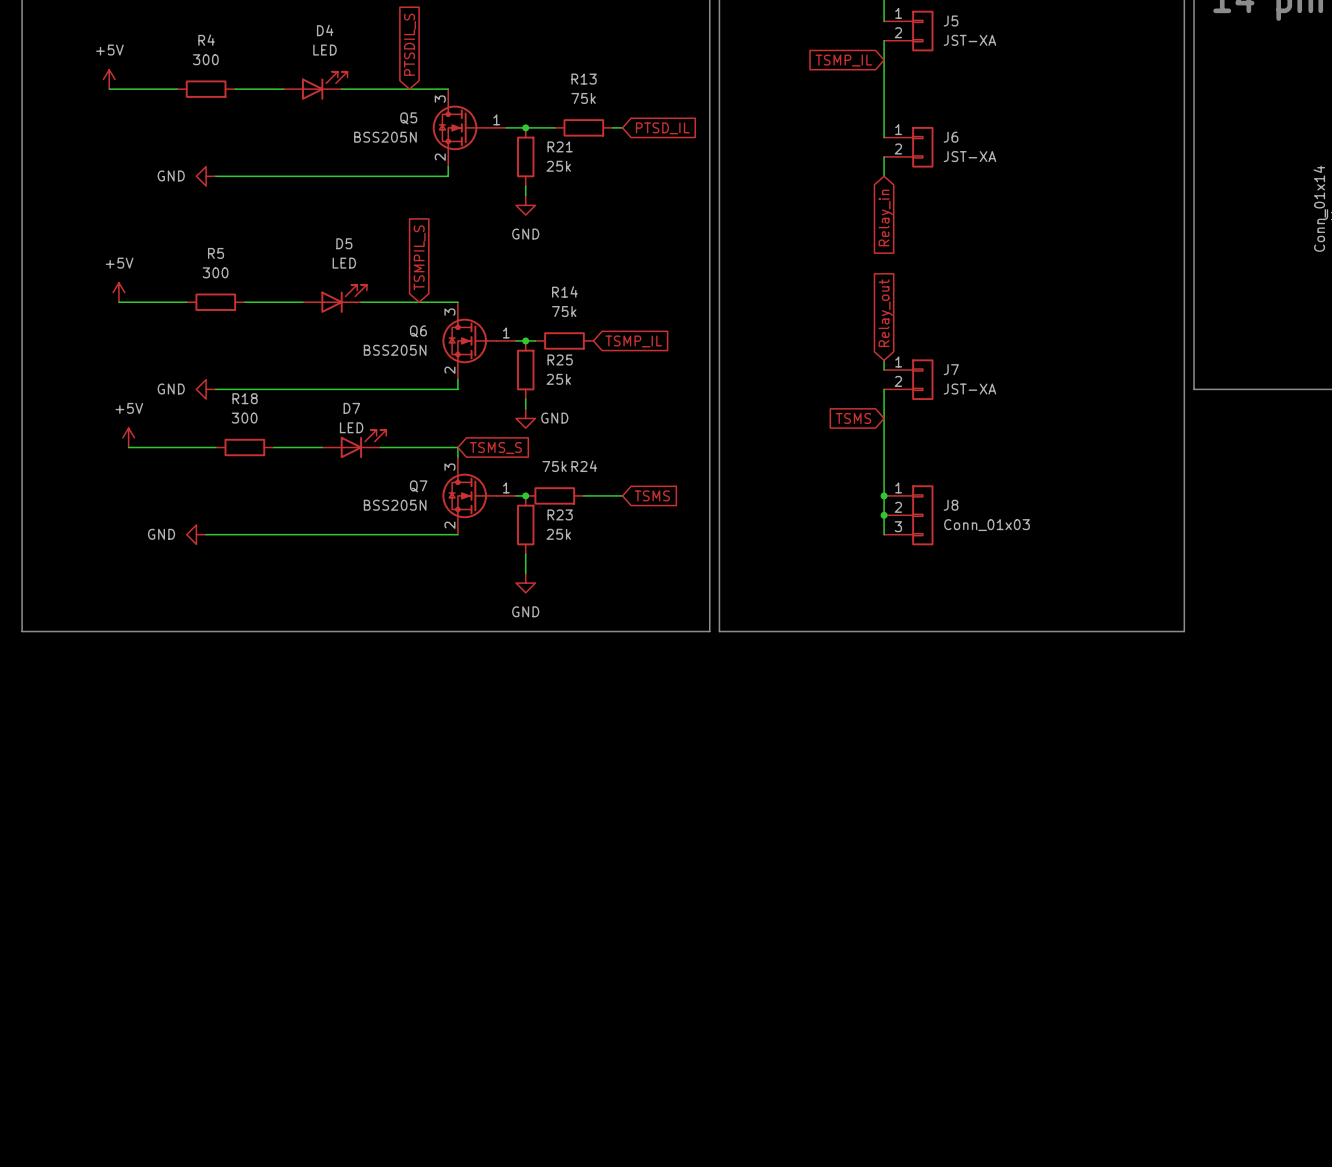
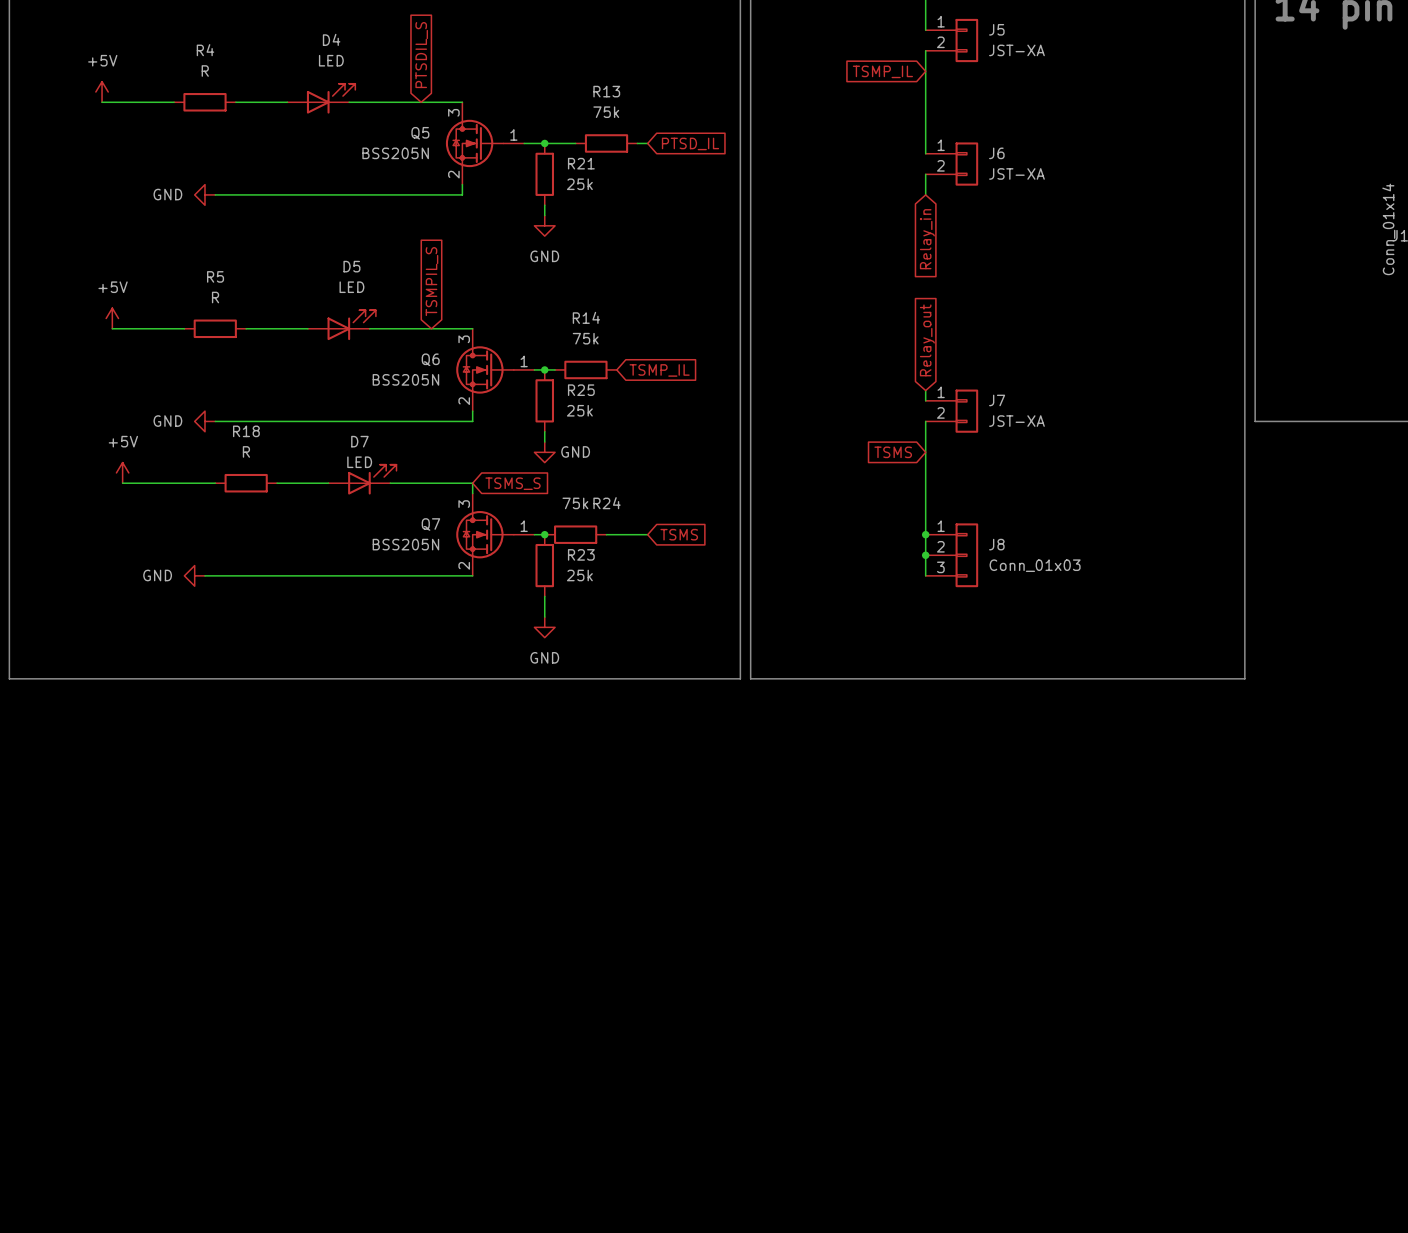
R4 value: 300 (205, 59) -> R (205, 71)
R5 value: 300 (215, 272) -> R (215, 297)
R18 value: 300 (244, 418) -> R (246, 451)

